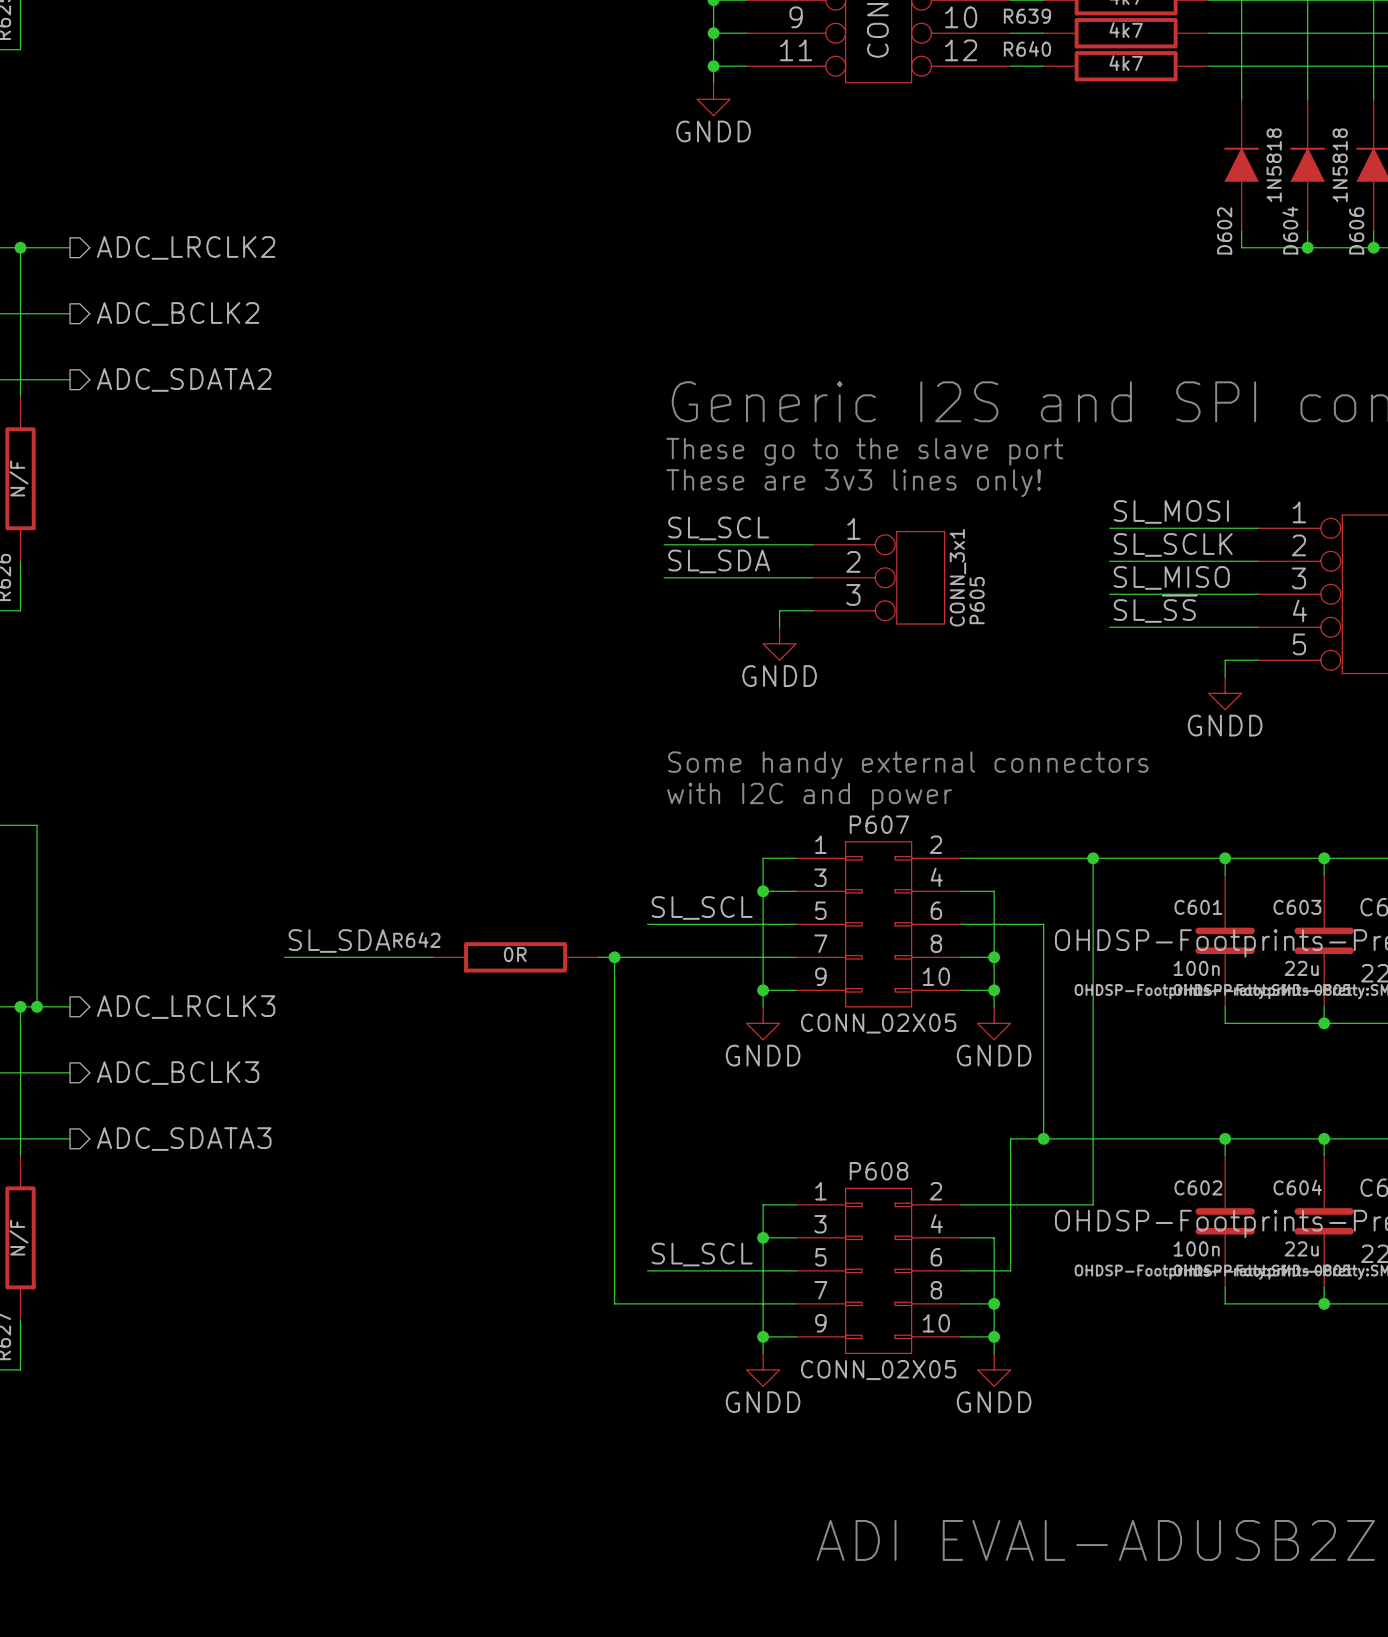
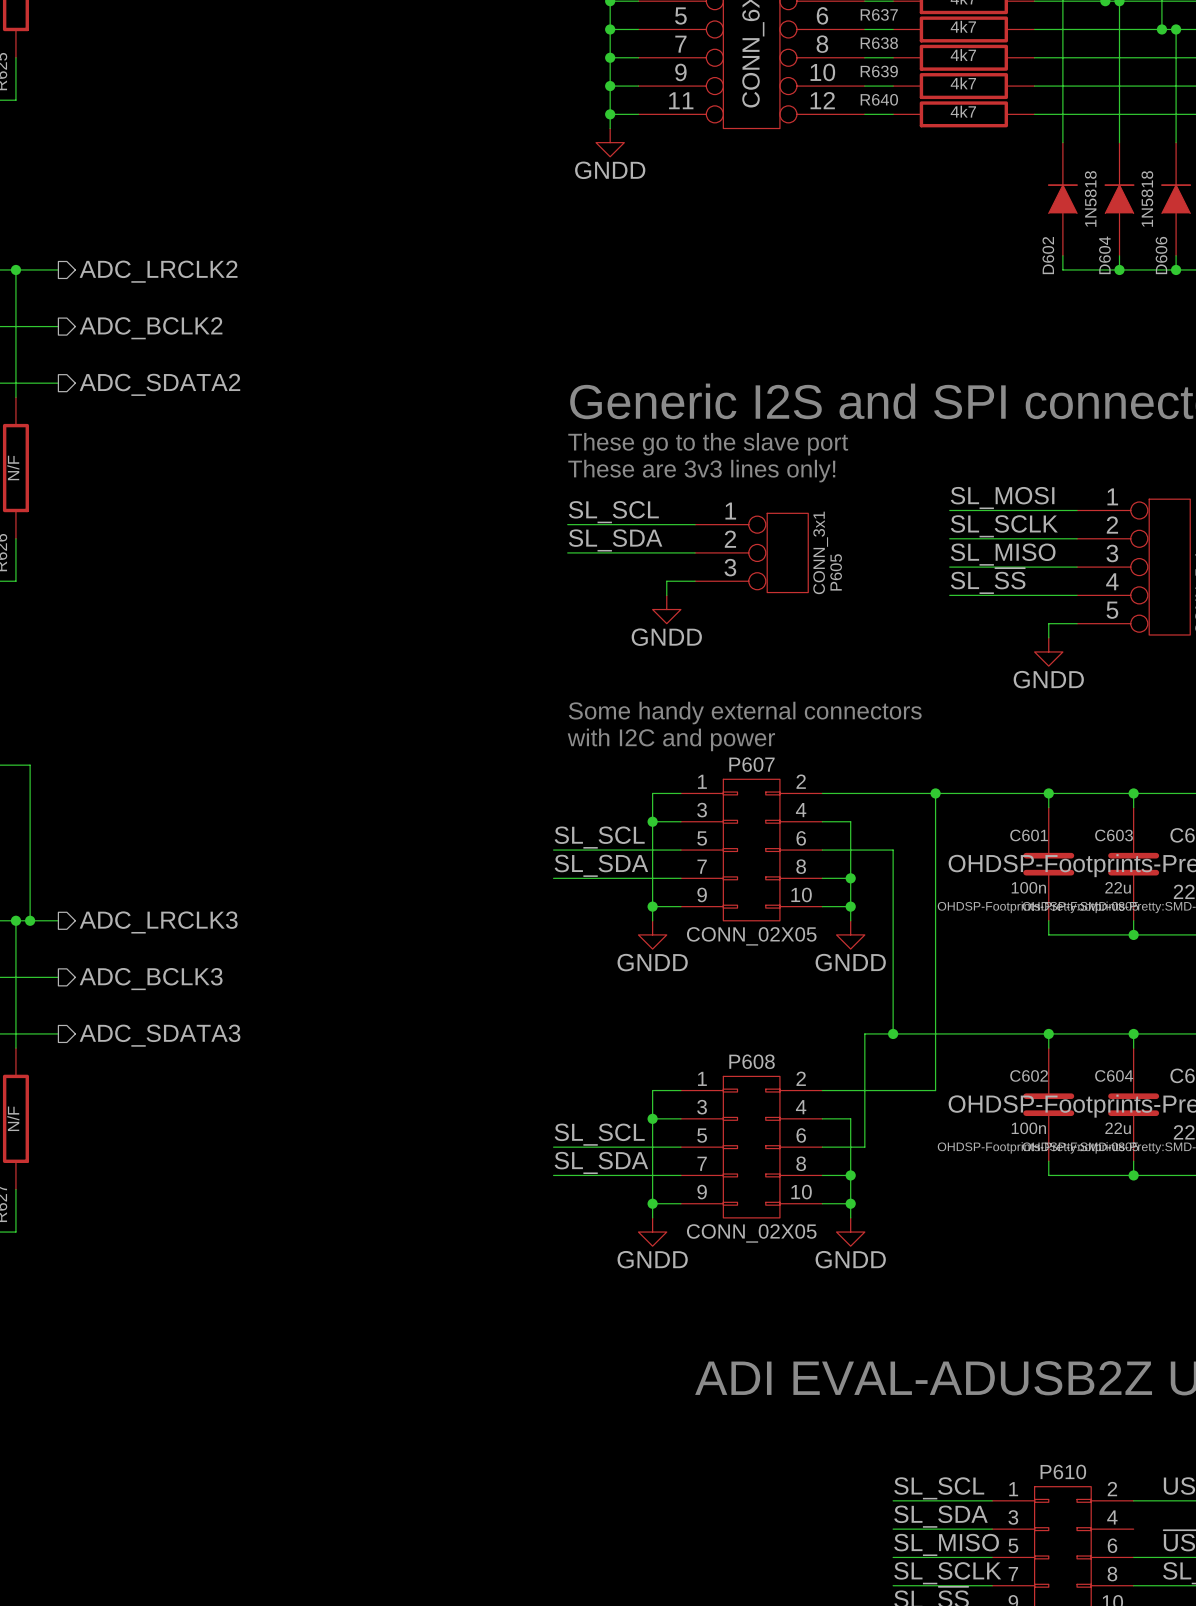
label: SL_SDA (339, 941) -> none
label: none -> SL_SDA (601, 865)
wire: (284, 957) (433, 957) -> none
R642: 0R (515, 957) -> none
wire: (598, 957) (647, 957) -> none
wire: (614, 957) (614, 1303) (647, 1303) -> none
junction: (614, 957) -> none
label: none -> SL_SDA (601, 1162)

